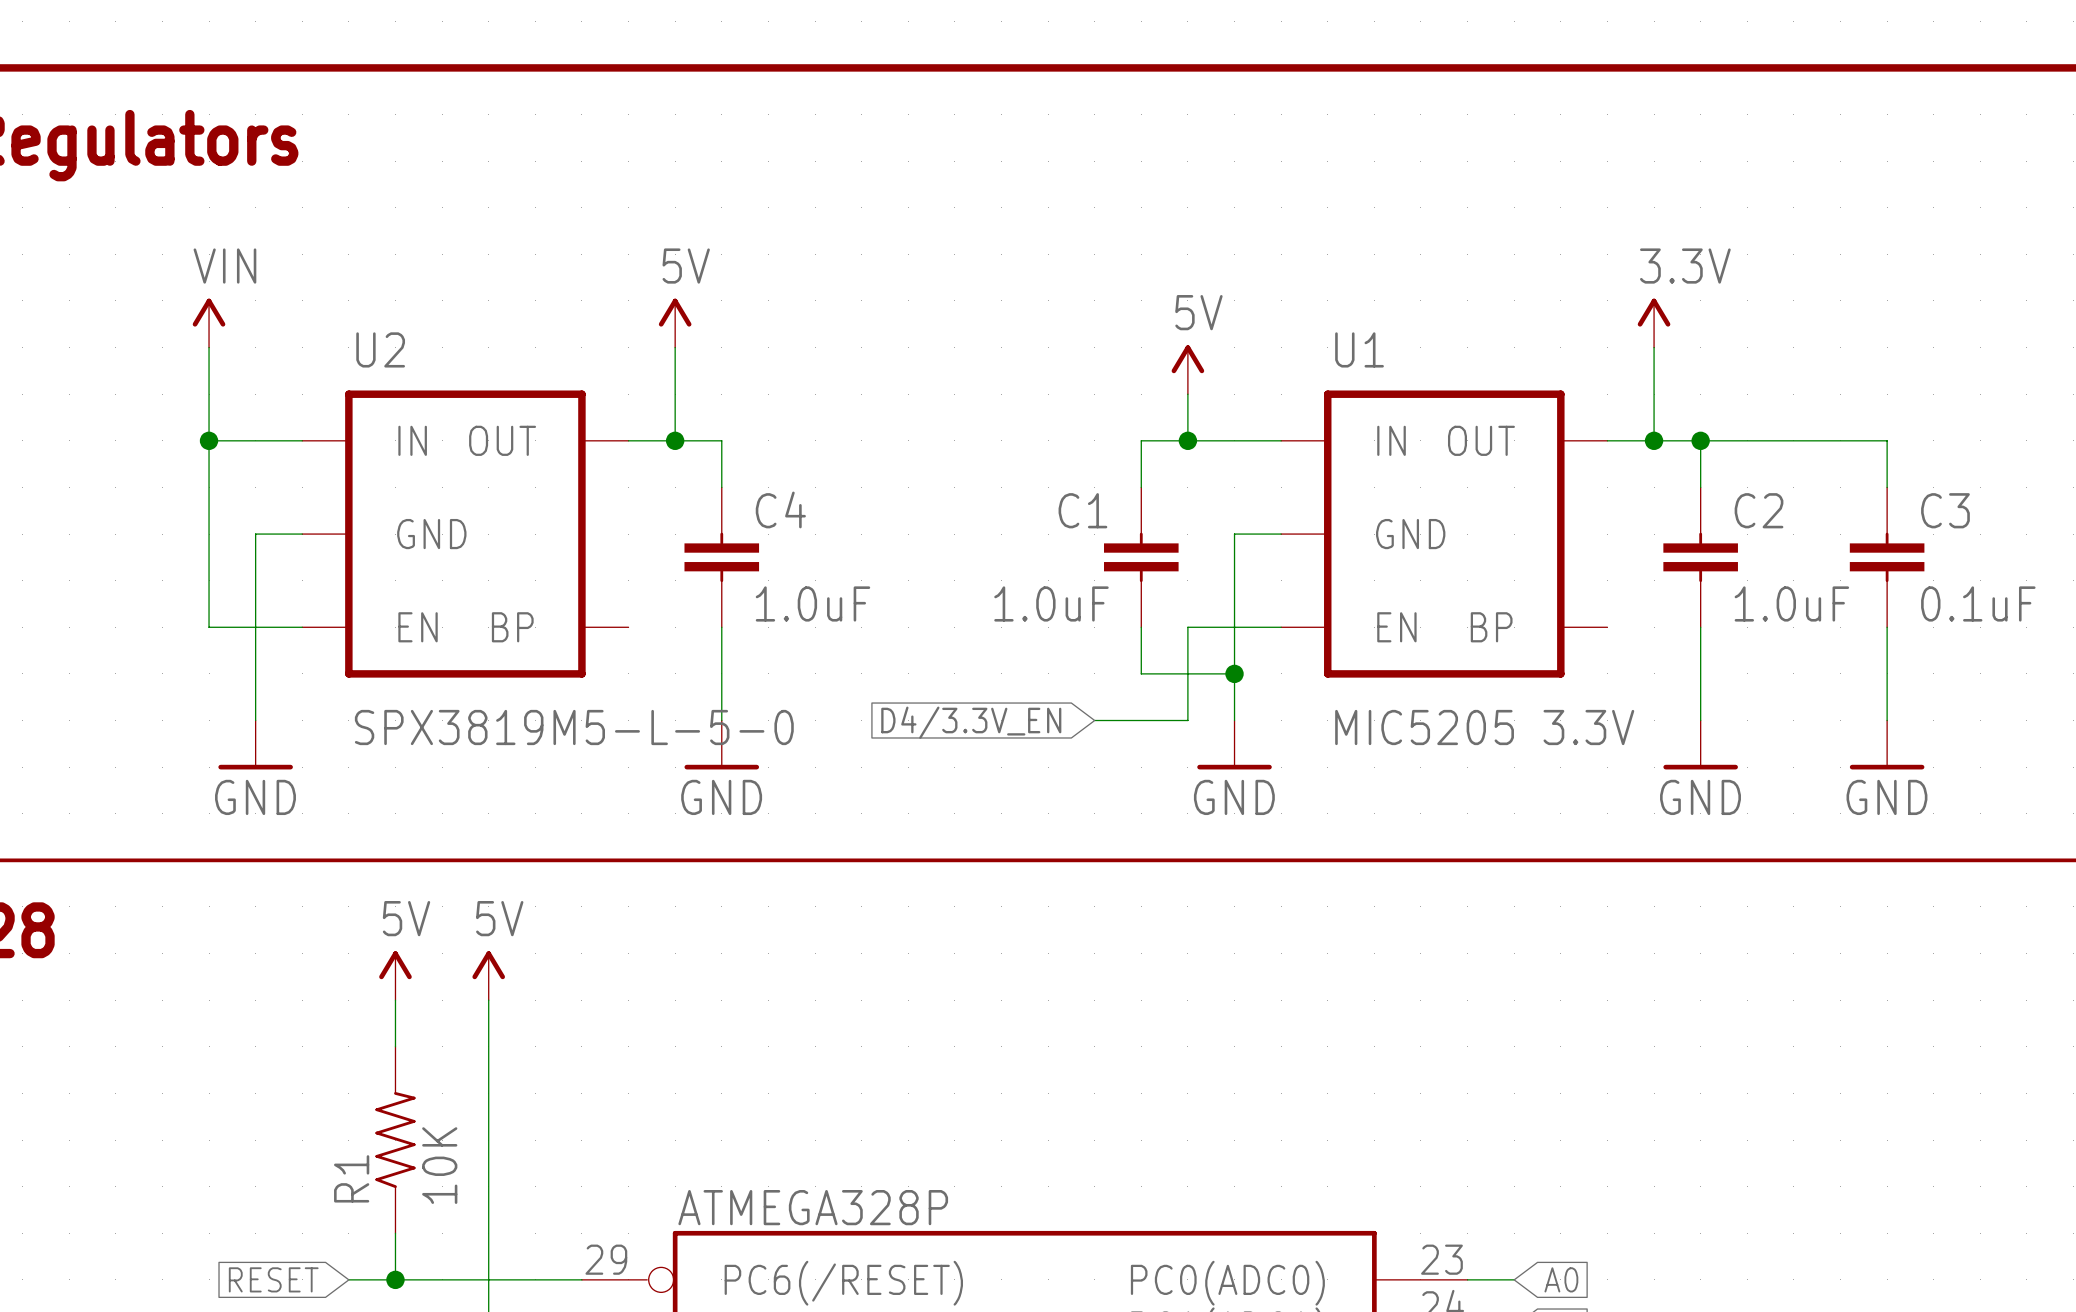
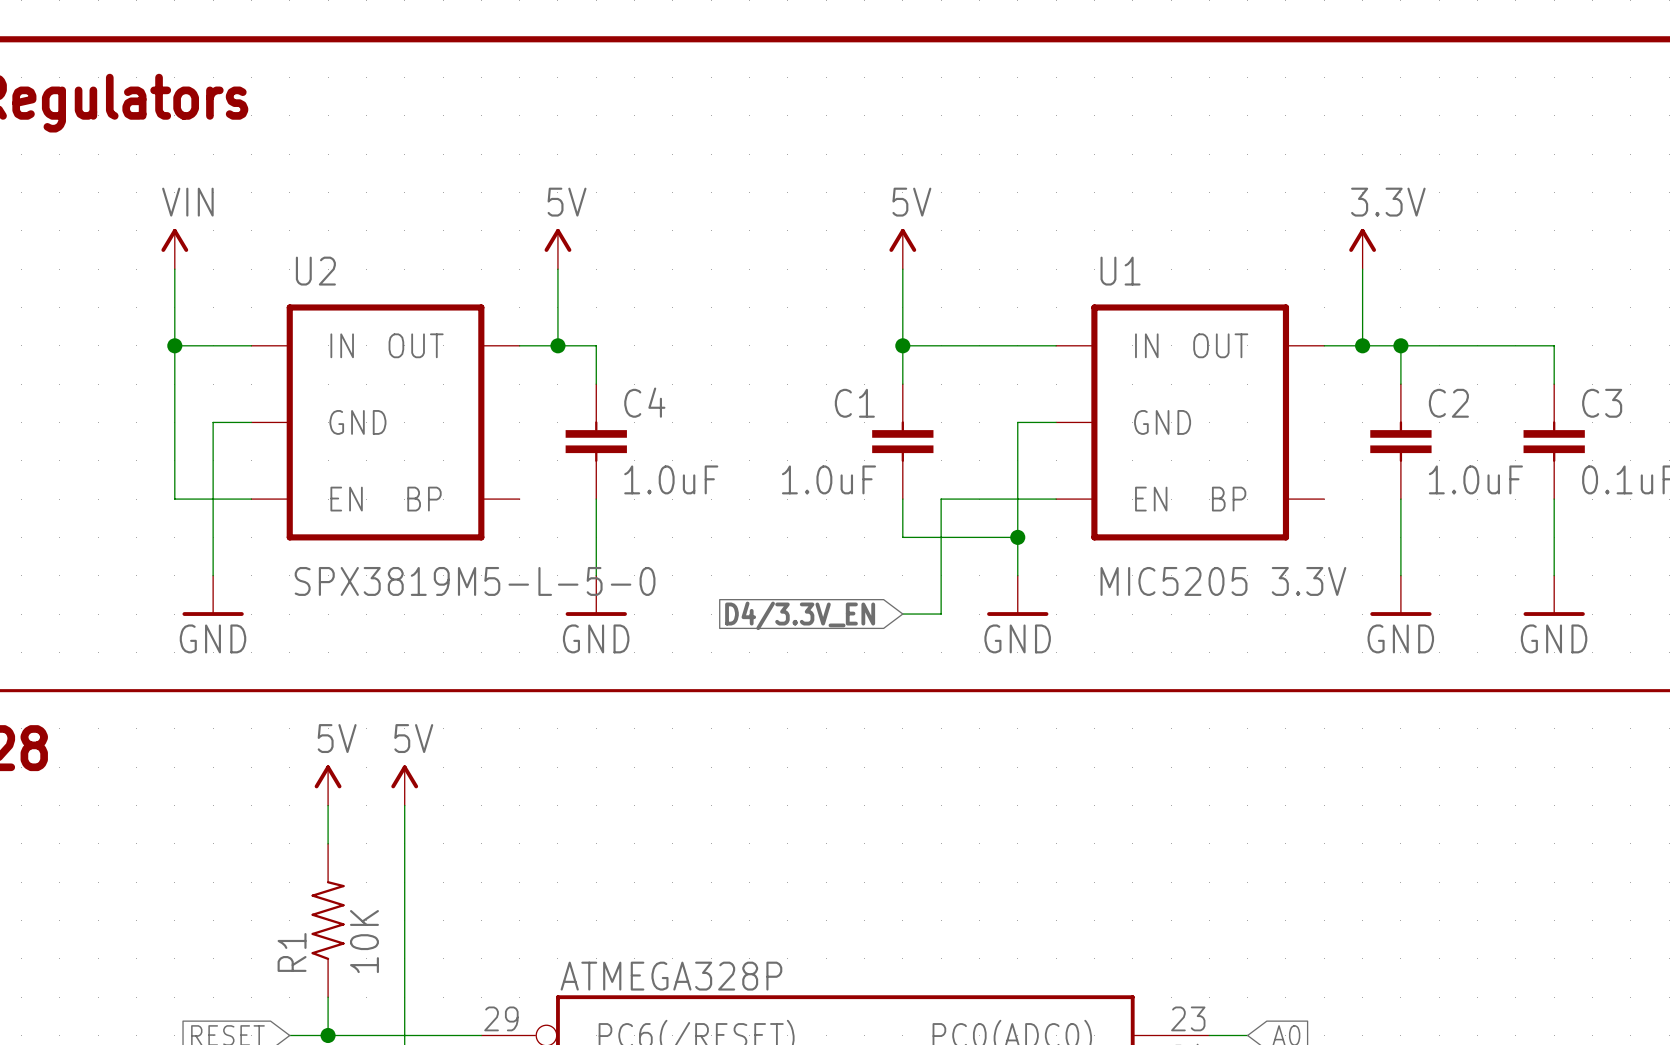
wire: none -> (902, 269) (902, 384)
power symbol position: 5V (1187, 369) -> 5V (902, 249)
wire: (1187, 394) (1187, 440) -> none
wire: (1141, 440) (1141, 487) -> (941, 345) (902, 345)
junction position: (1187, 440) -> (902, 345)
C1 position: (1141, 557) -> (902, 441)
wire: none -> (902, 499) (902, 537) (941, 537) (941, 614) (902, 614)
wire: (1187, 627) (1187, 720) (1094, 720) -> (979, 499) (941, 499)
global label position: D4/3.3V_EN (971, 722) -> D4/3.3V_EN (800, 615)

